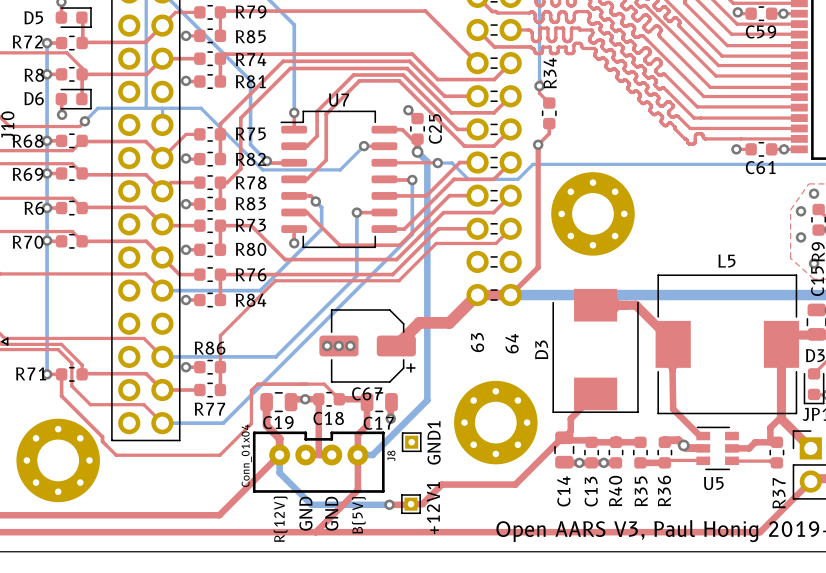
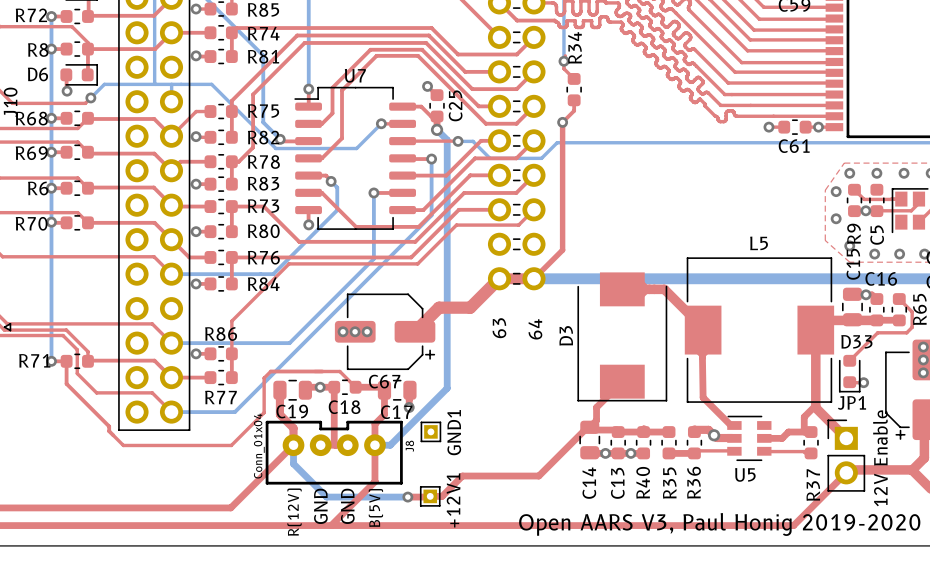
part: (592, 213) -> none
part: (495, 422) -> none
part: (58, 460) -> none

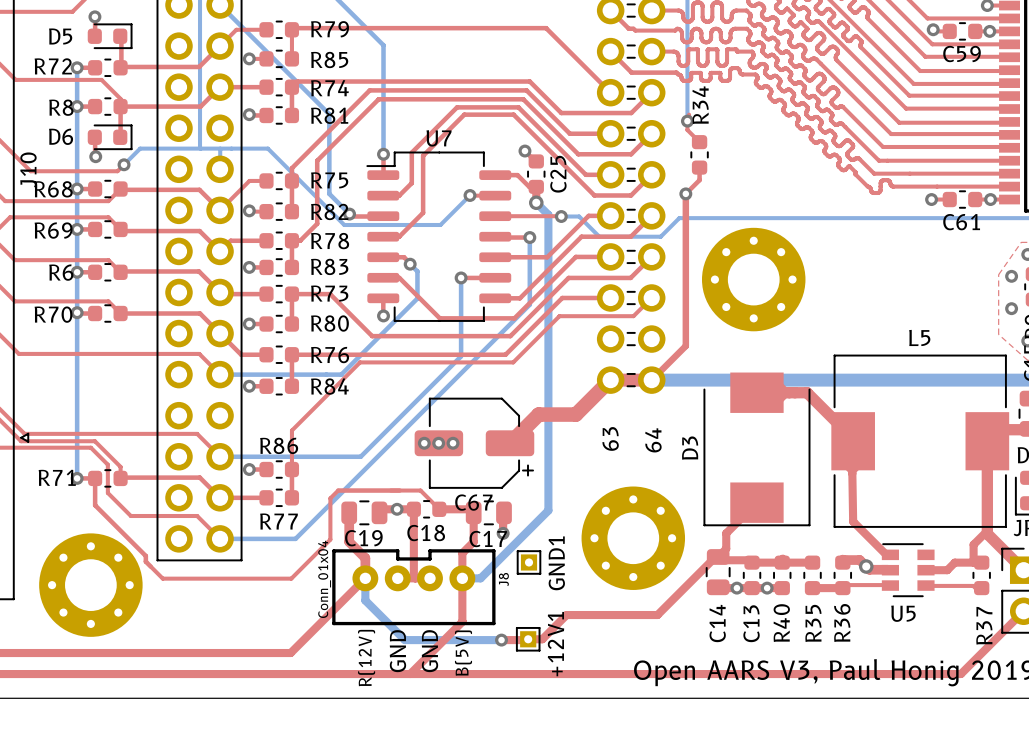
part: none -> (753, 279)
part: none -> (633, 538)
part: none -> (90, 585)

